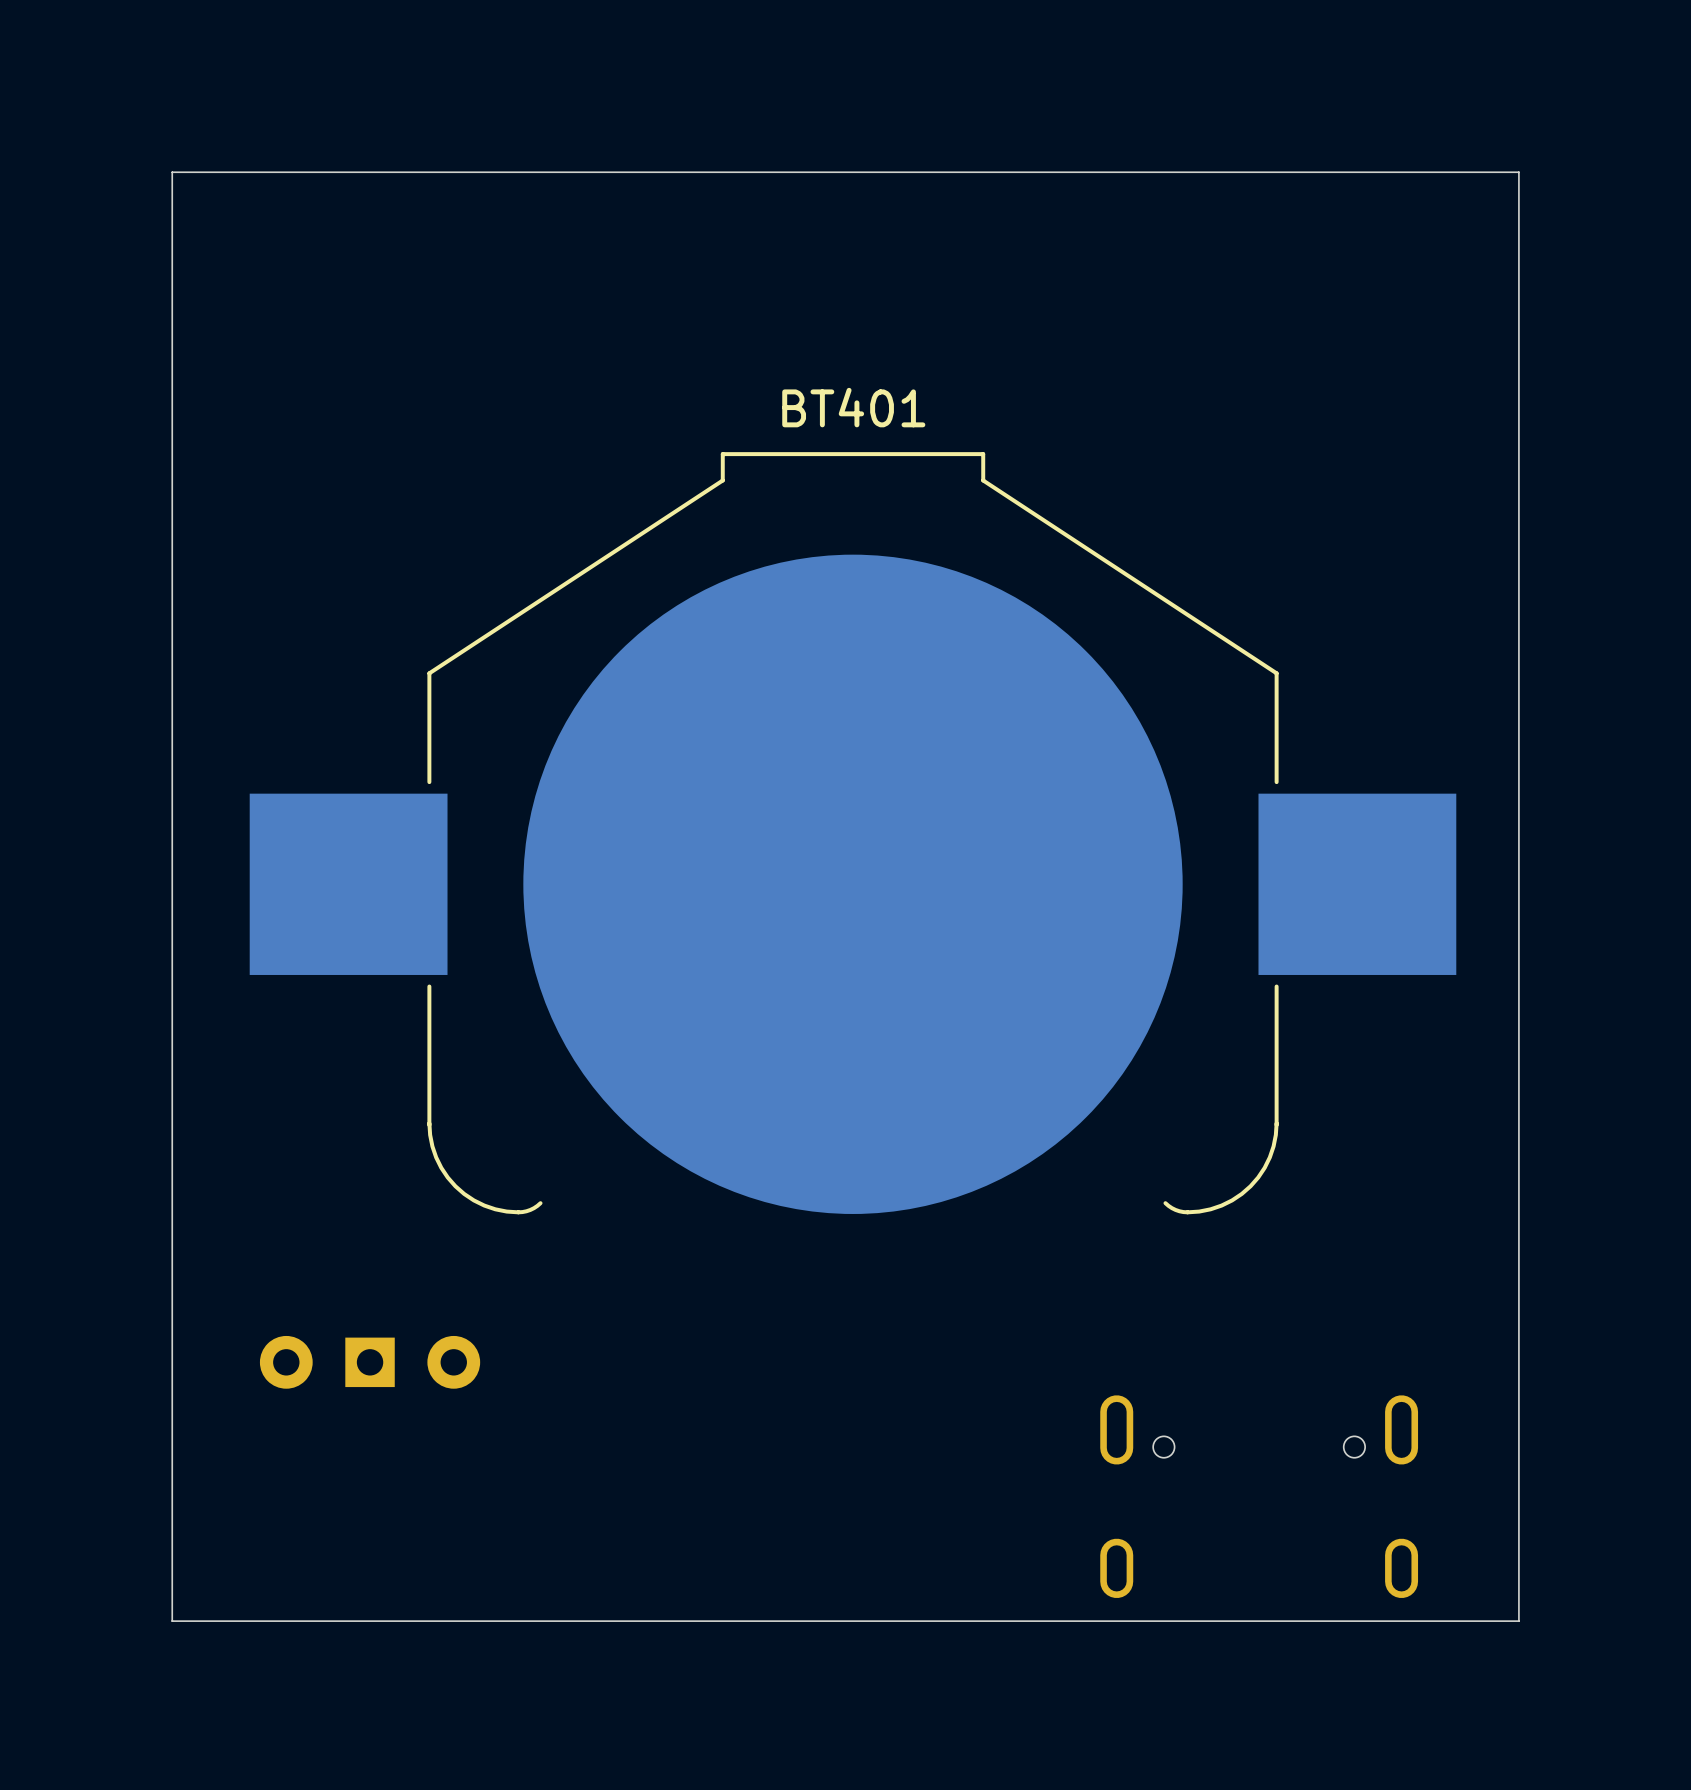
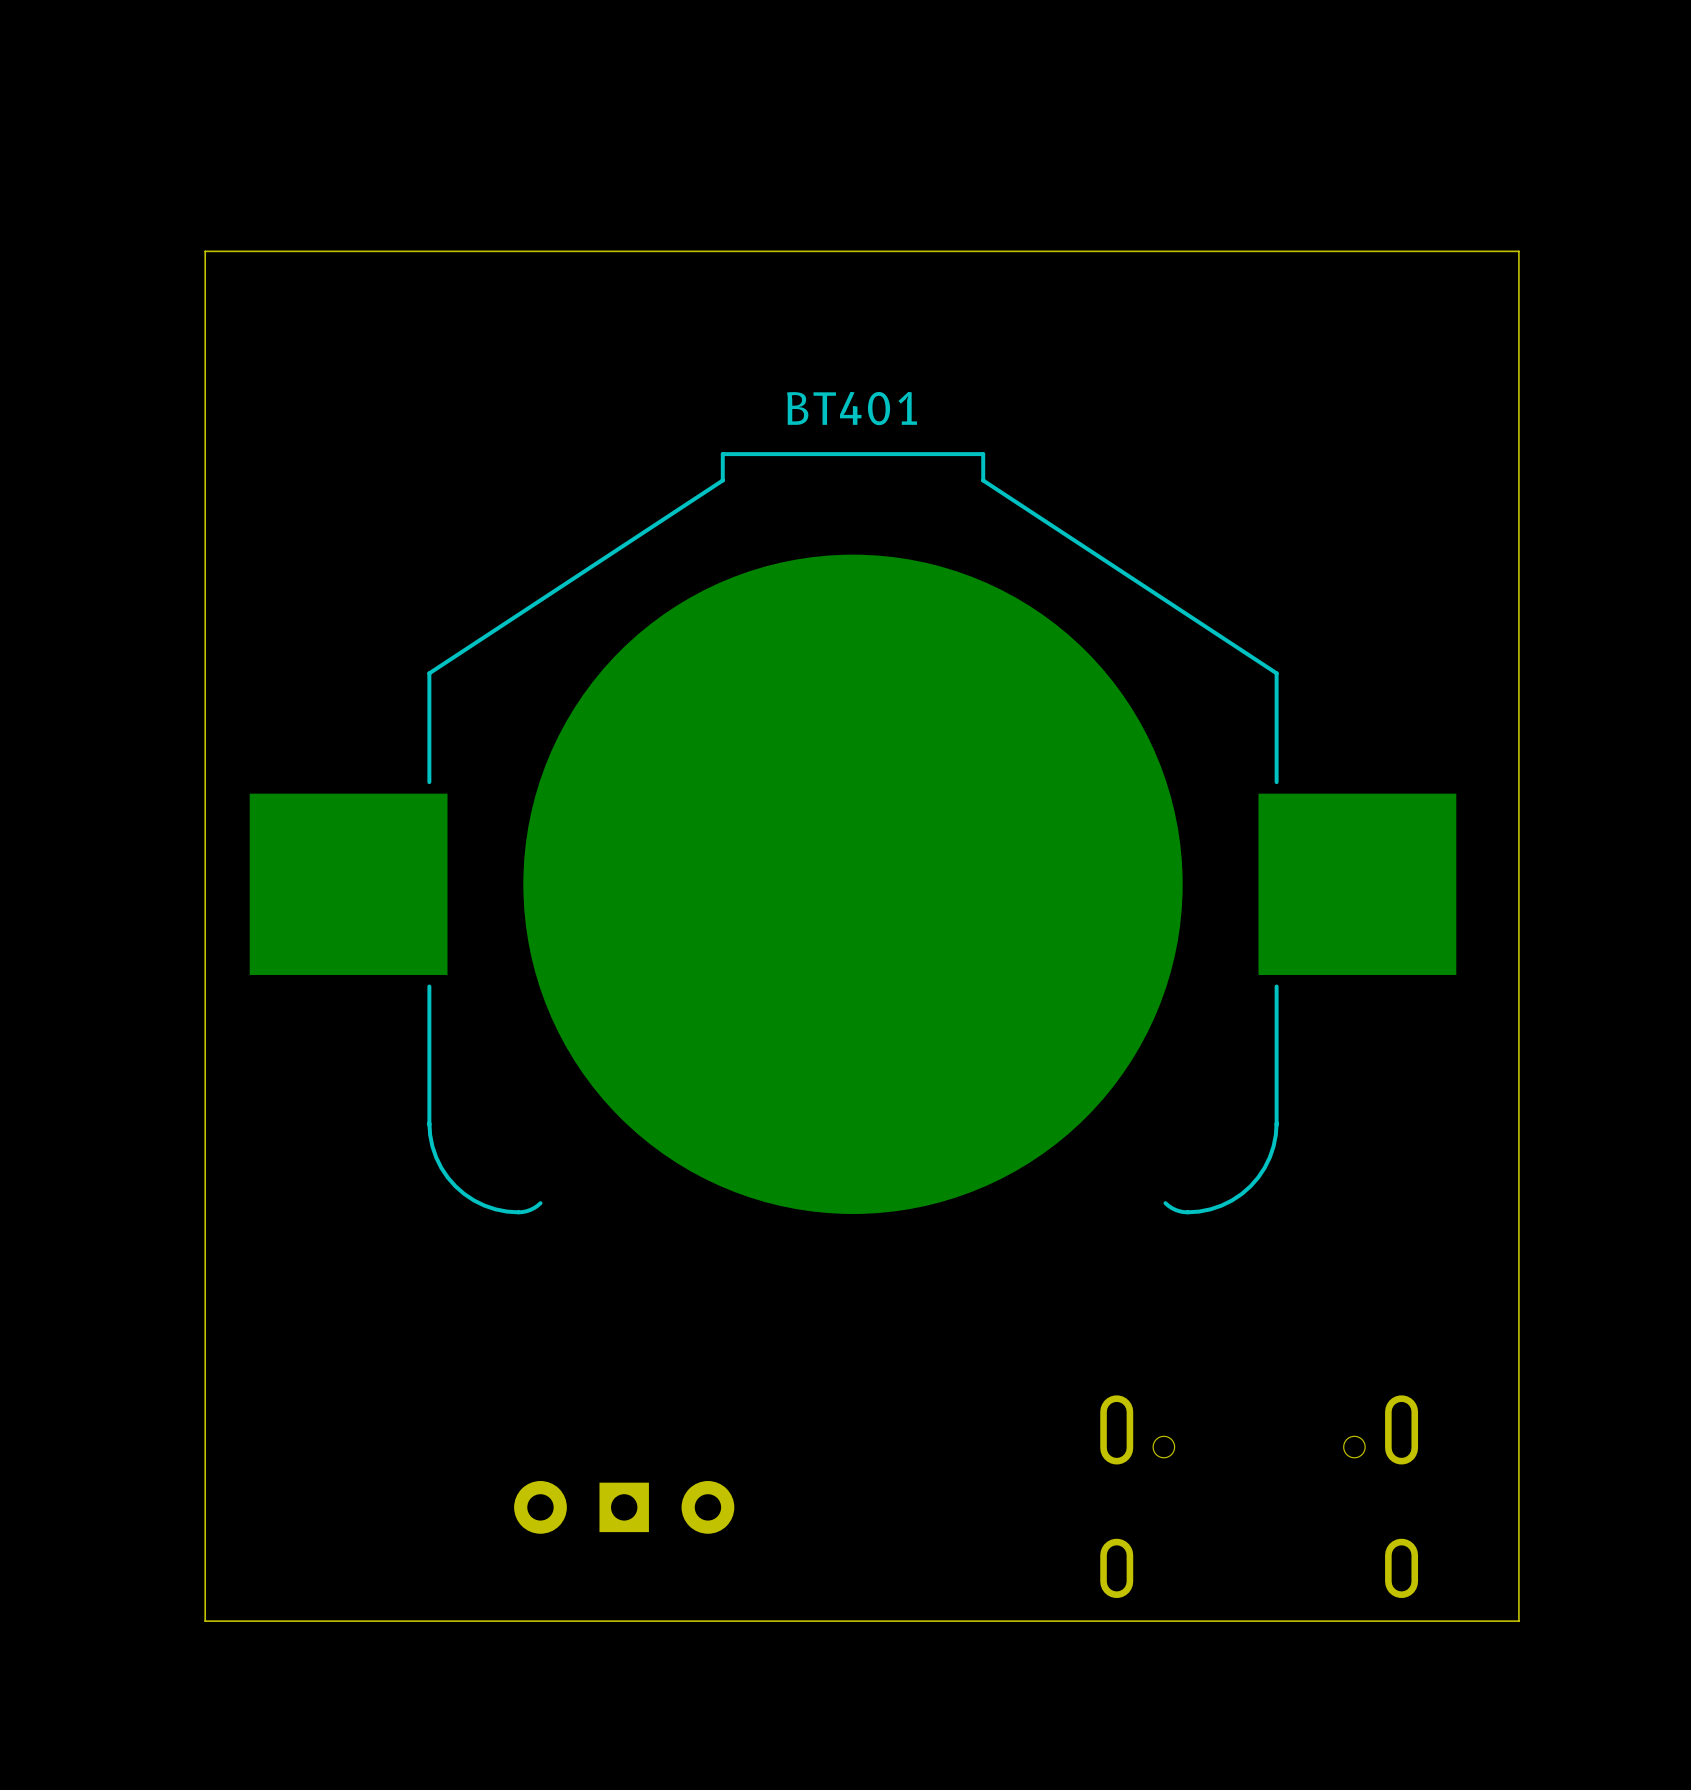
board edge: (1518, 251) (1518, 172) (172, 172) (172, 1621) (205, 1621) -> (1518, 251) (205, 251) (205, 1621)
part position: (370, 1362) -> (624, 1507)

